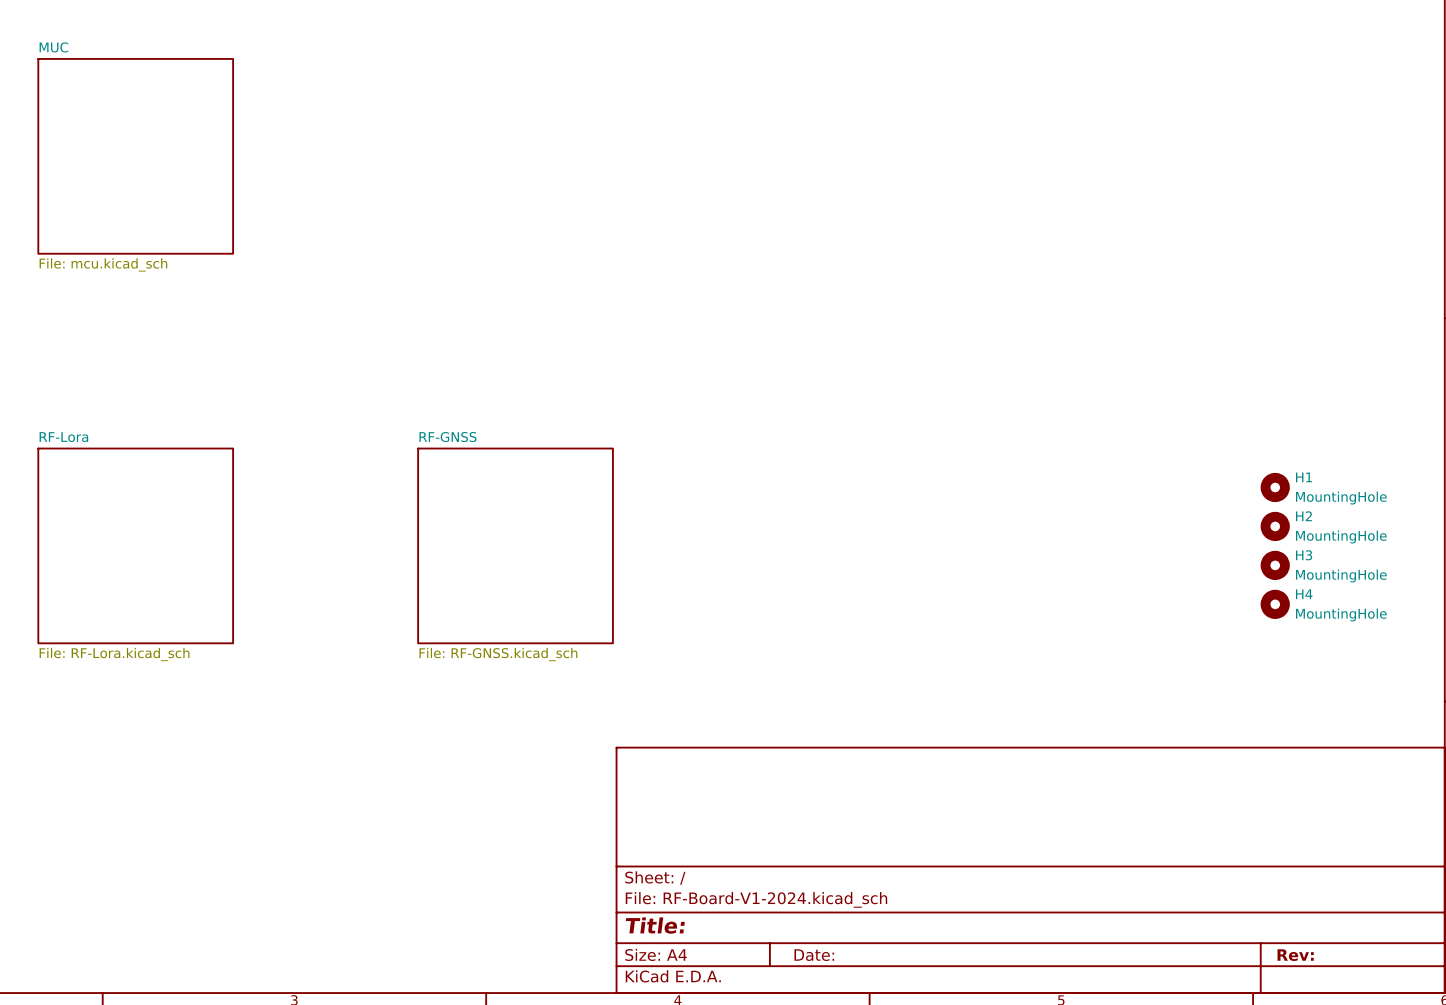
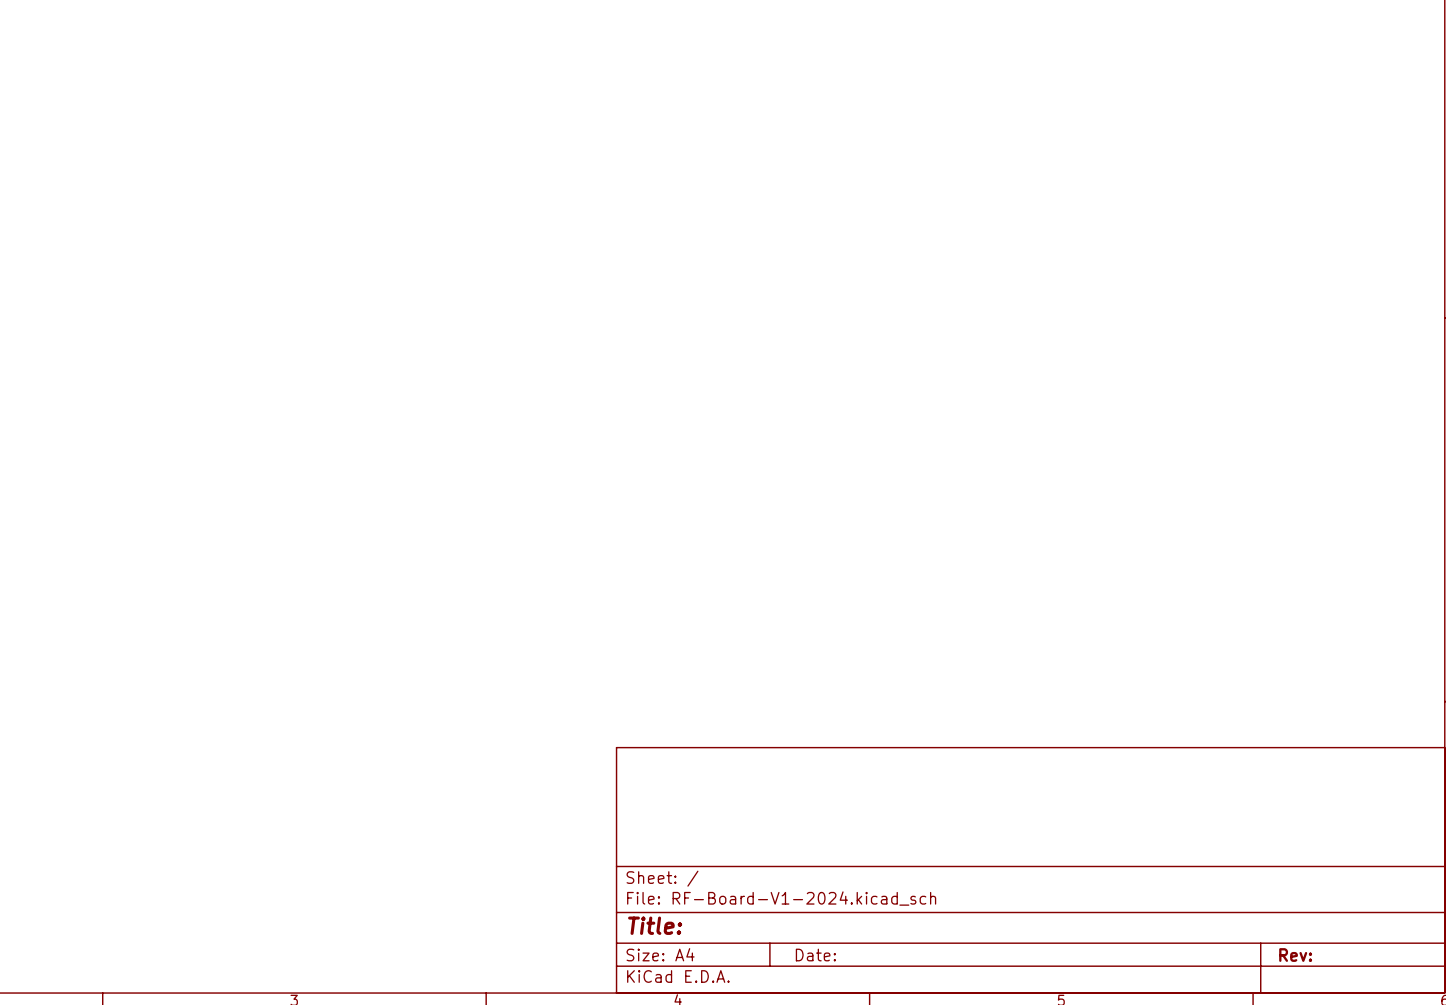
sheet MUC: File: mcu.kicad_sch (135, 156) -> none
H1: MountingHole (1275, 487) -> none
H2: MountingHole (1275, 526) -> none
sheet RF-Lora: File: RF-Lora.kicad_sch (135, 545) -> none
sheet RF-GNSS: File: RF-GNSS.kicad_sch (515, 545) -> none
H3: MountingHole (1275, 565) -> none
H4: MountingHole (1275, 604) -> none

